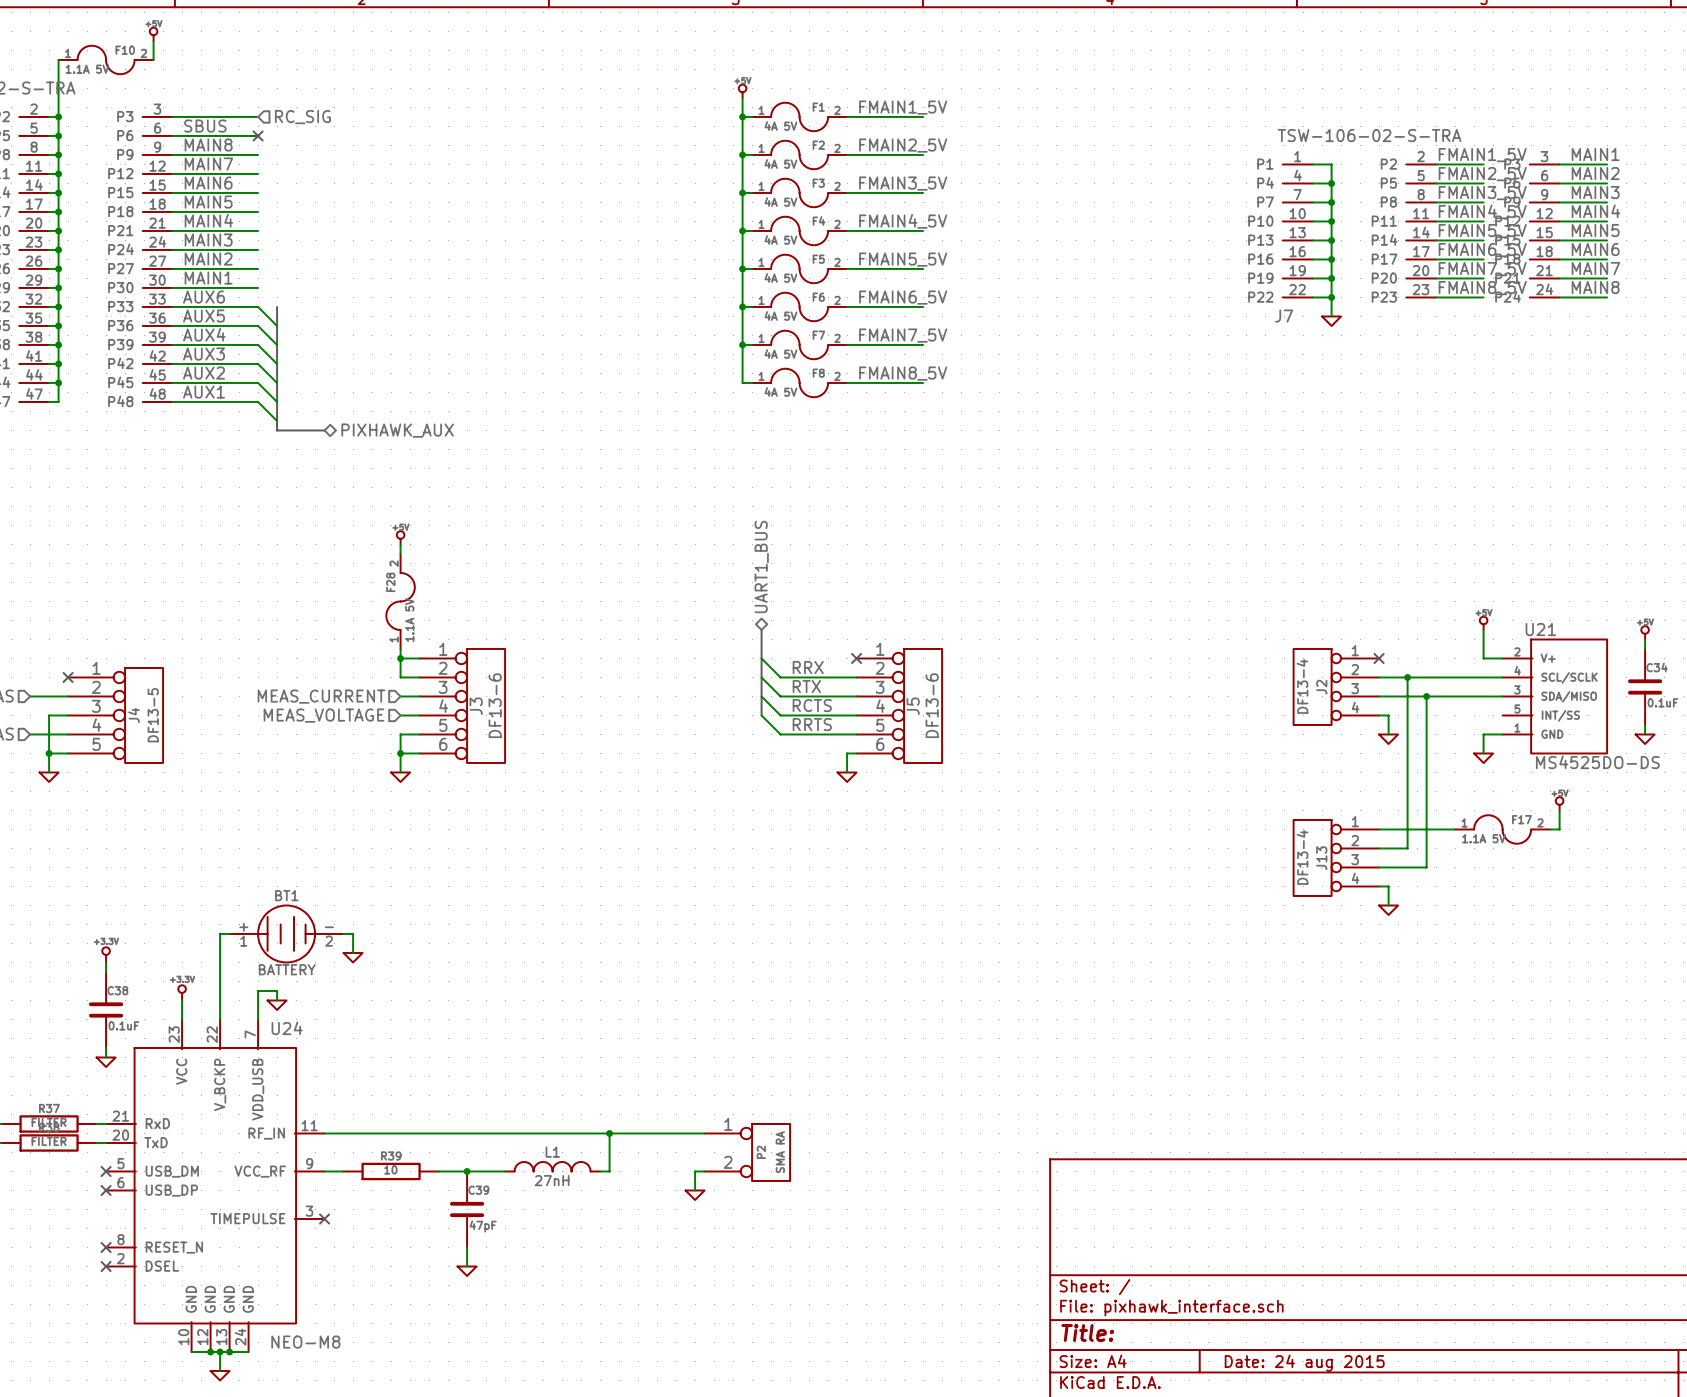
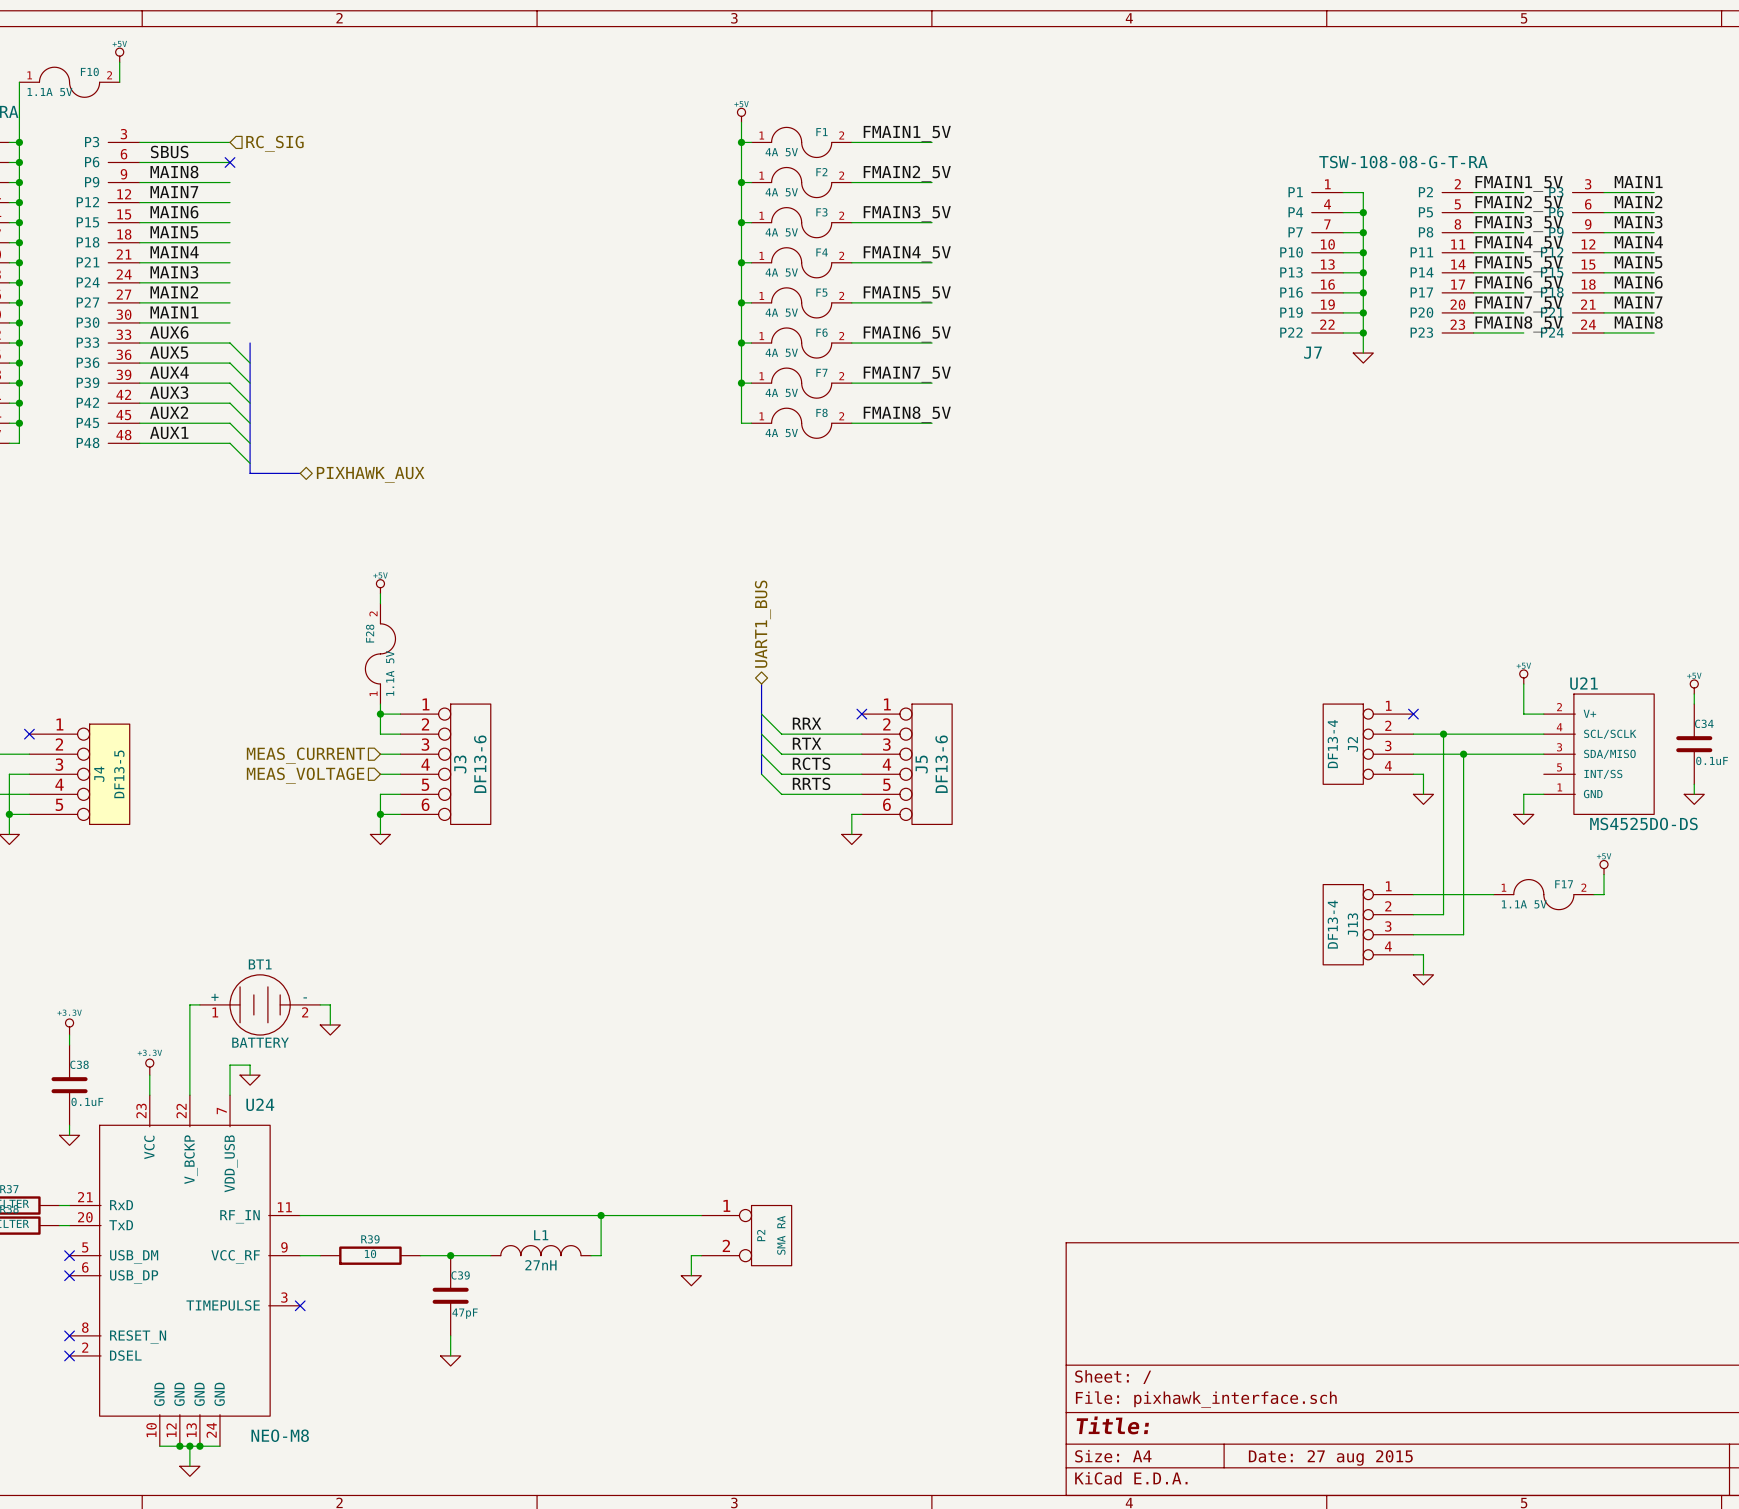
J7 value: TSW-106-02-S-TRA (1369, 135) -> TSW-108-08-G-T-RA (1403, 162)
title block: Date: 24 aug 2015 (1304, 1363) -> Date: 27 aug 2015 (1330, 1457)

